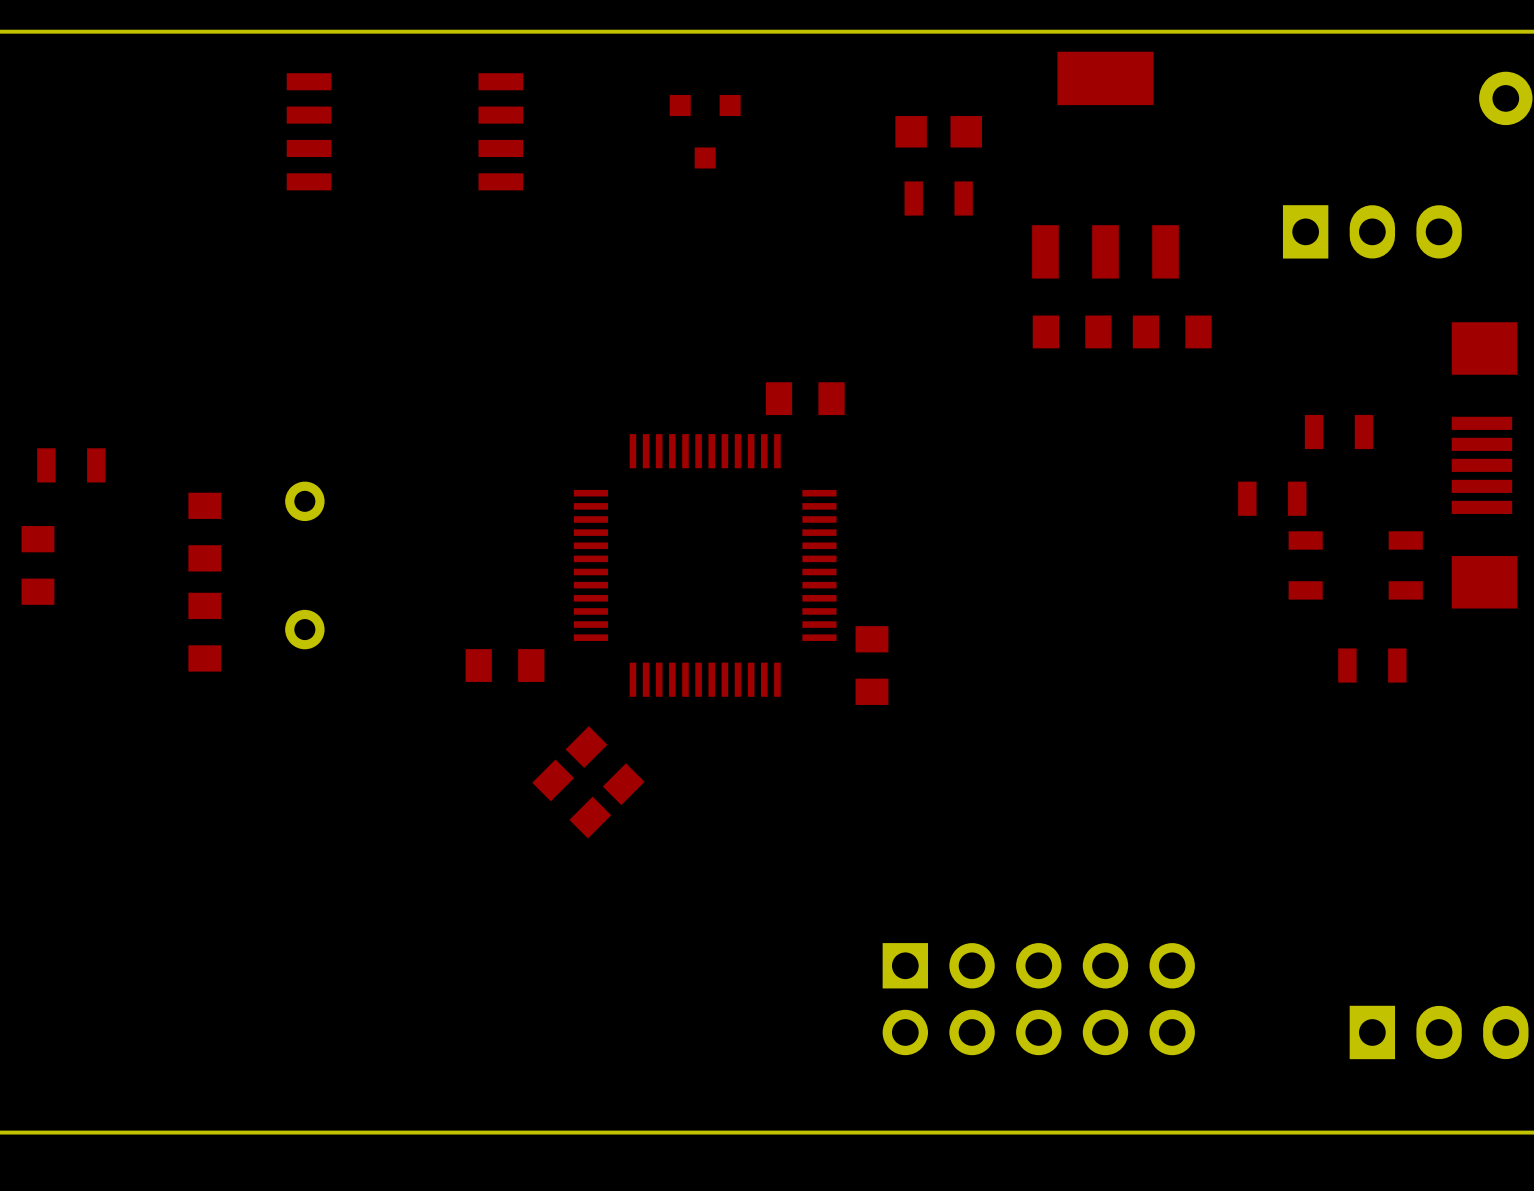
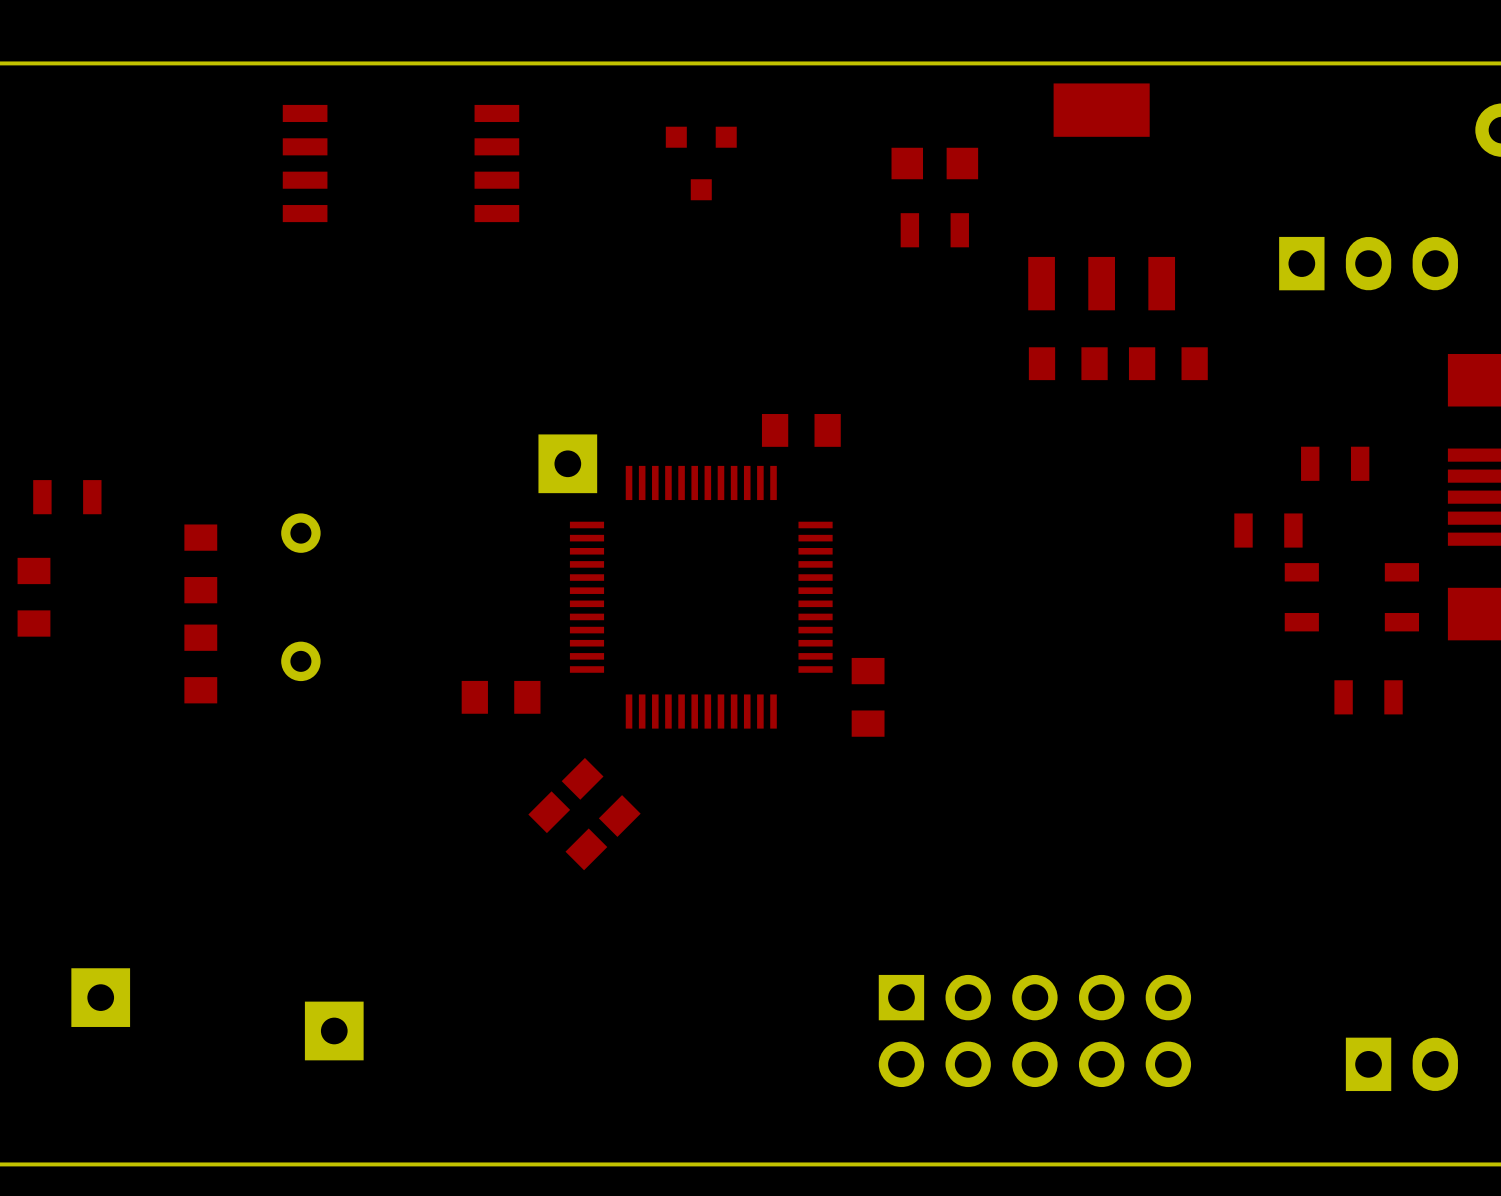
part: none -> (567, 463)
part: none -> (100, 997)
part: none -> (334, 1030)

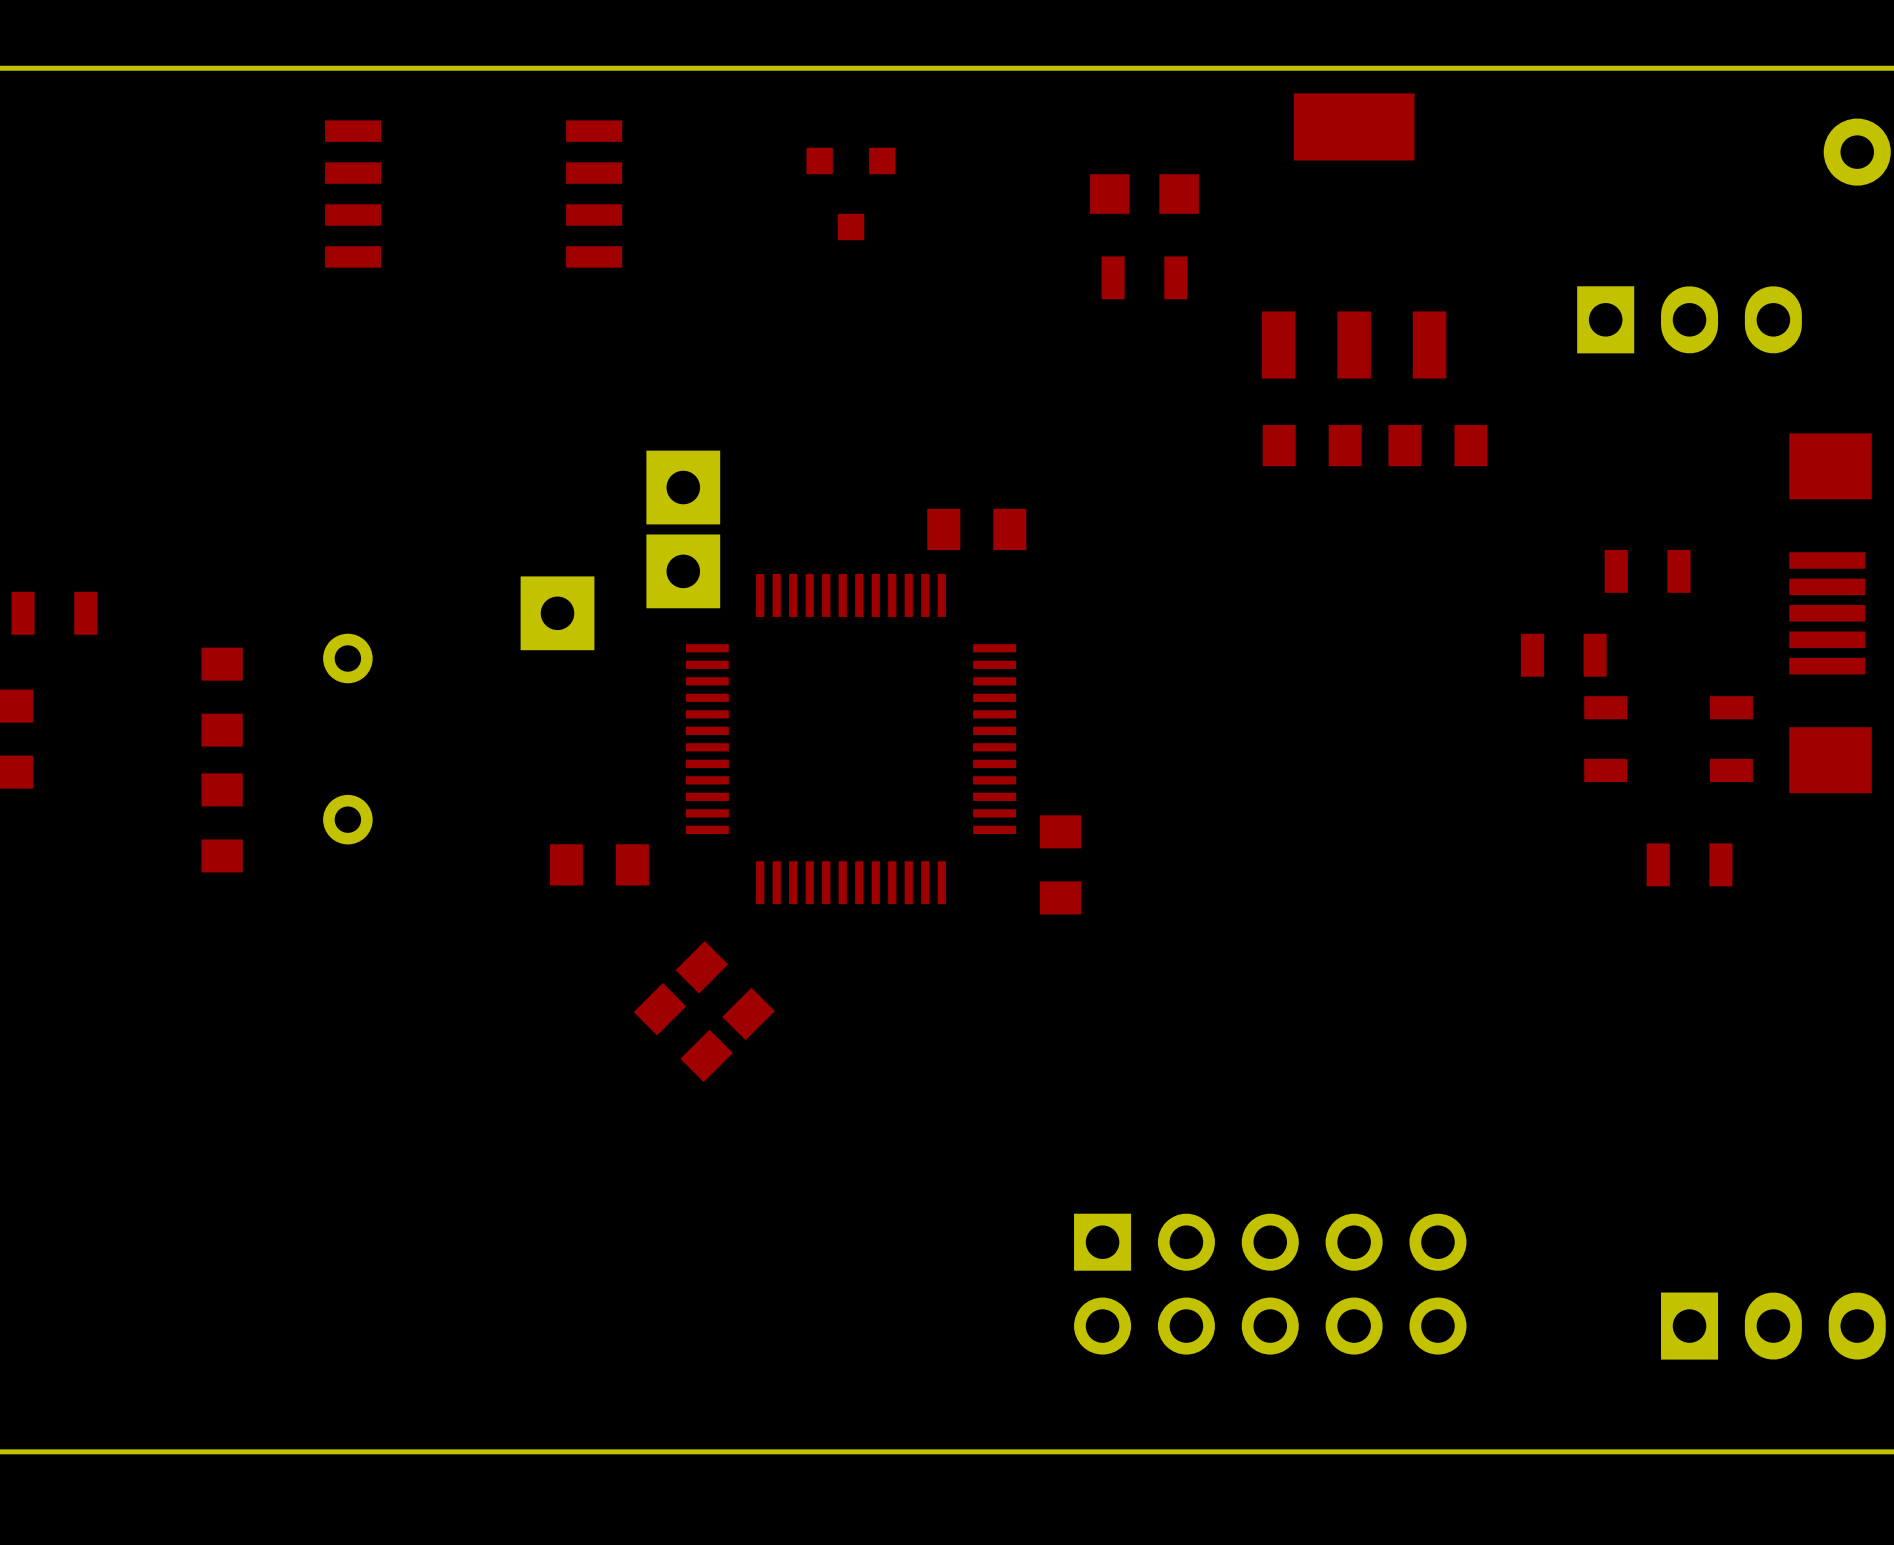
part: none -> (683, 487)
part: none -> (557, 613)
part: (100, 997) -> none
part: (334, 1030) -> none

